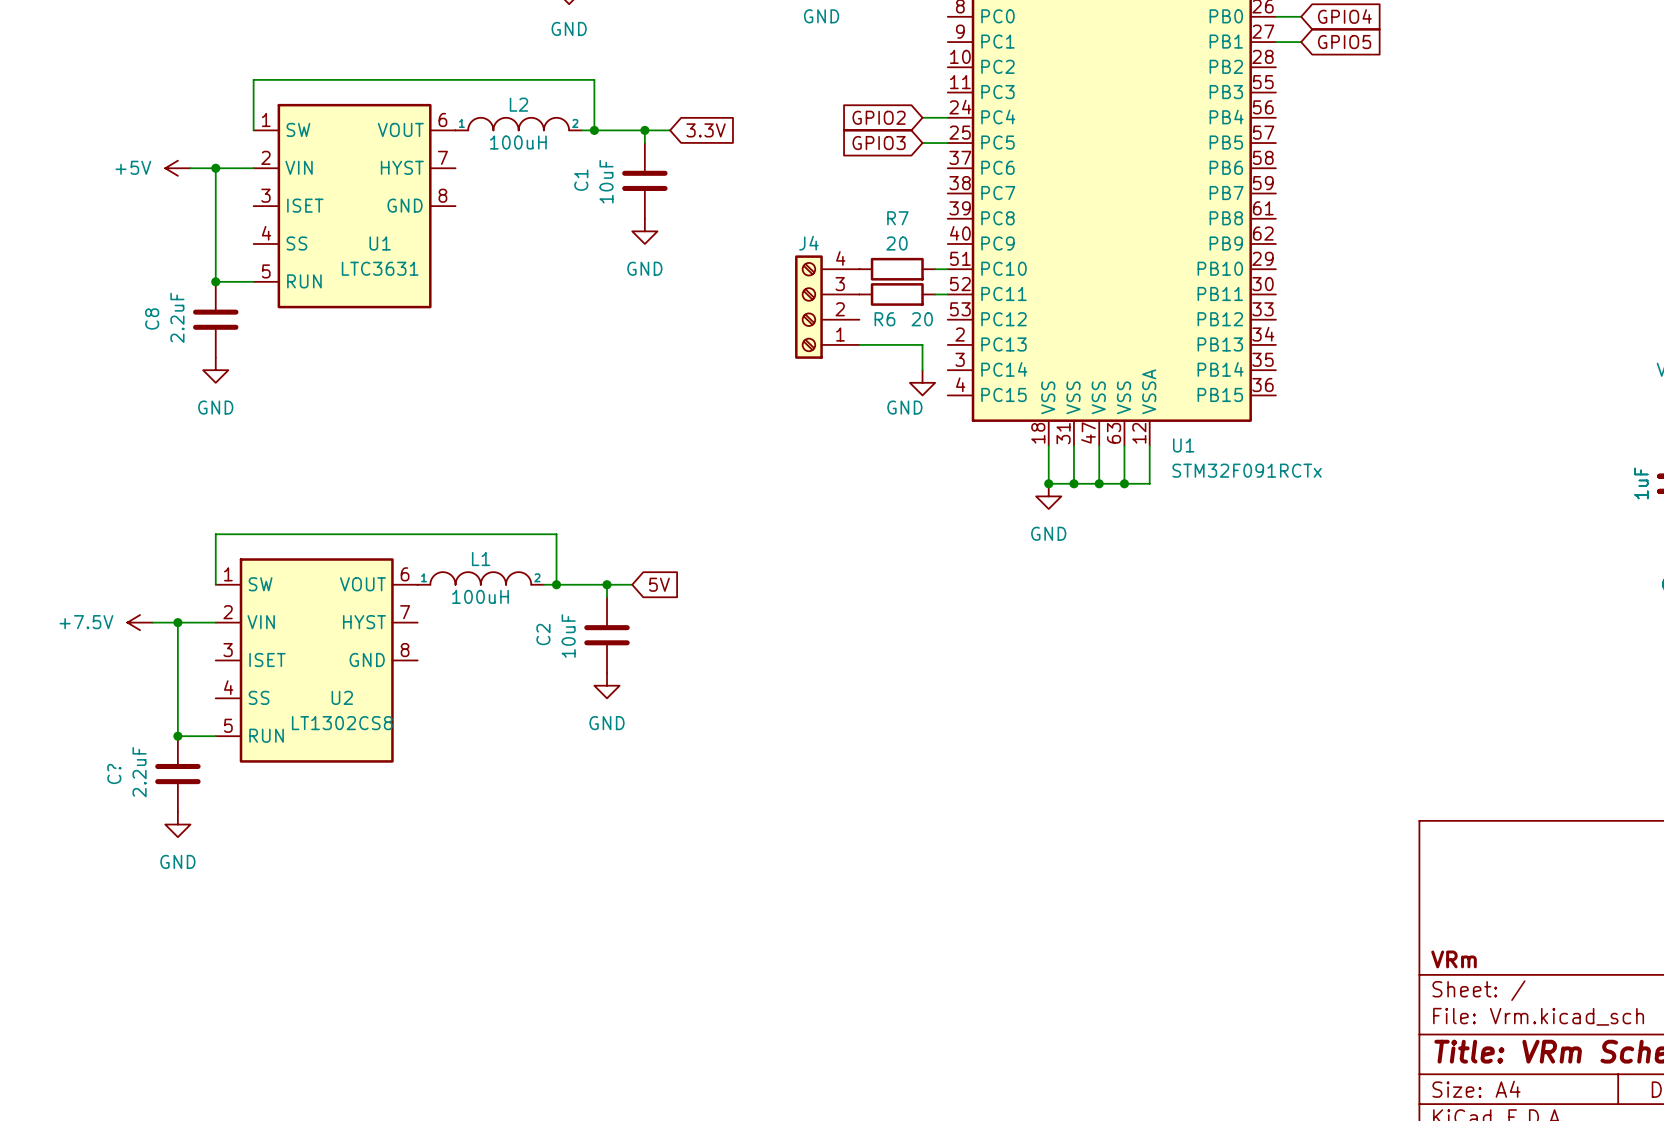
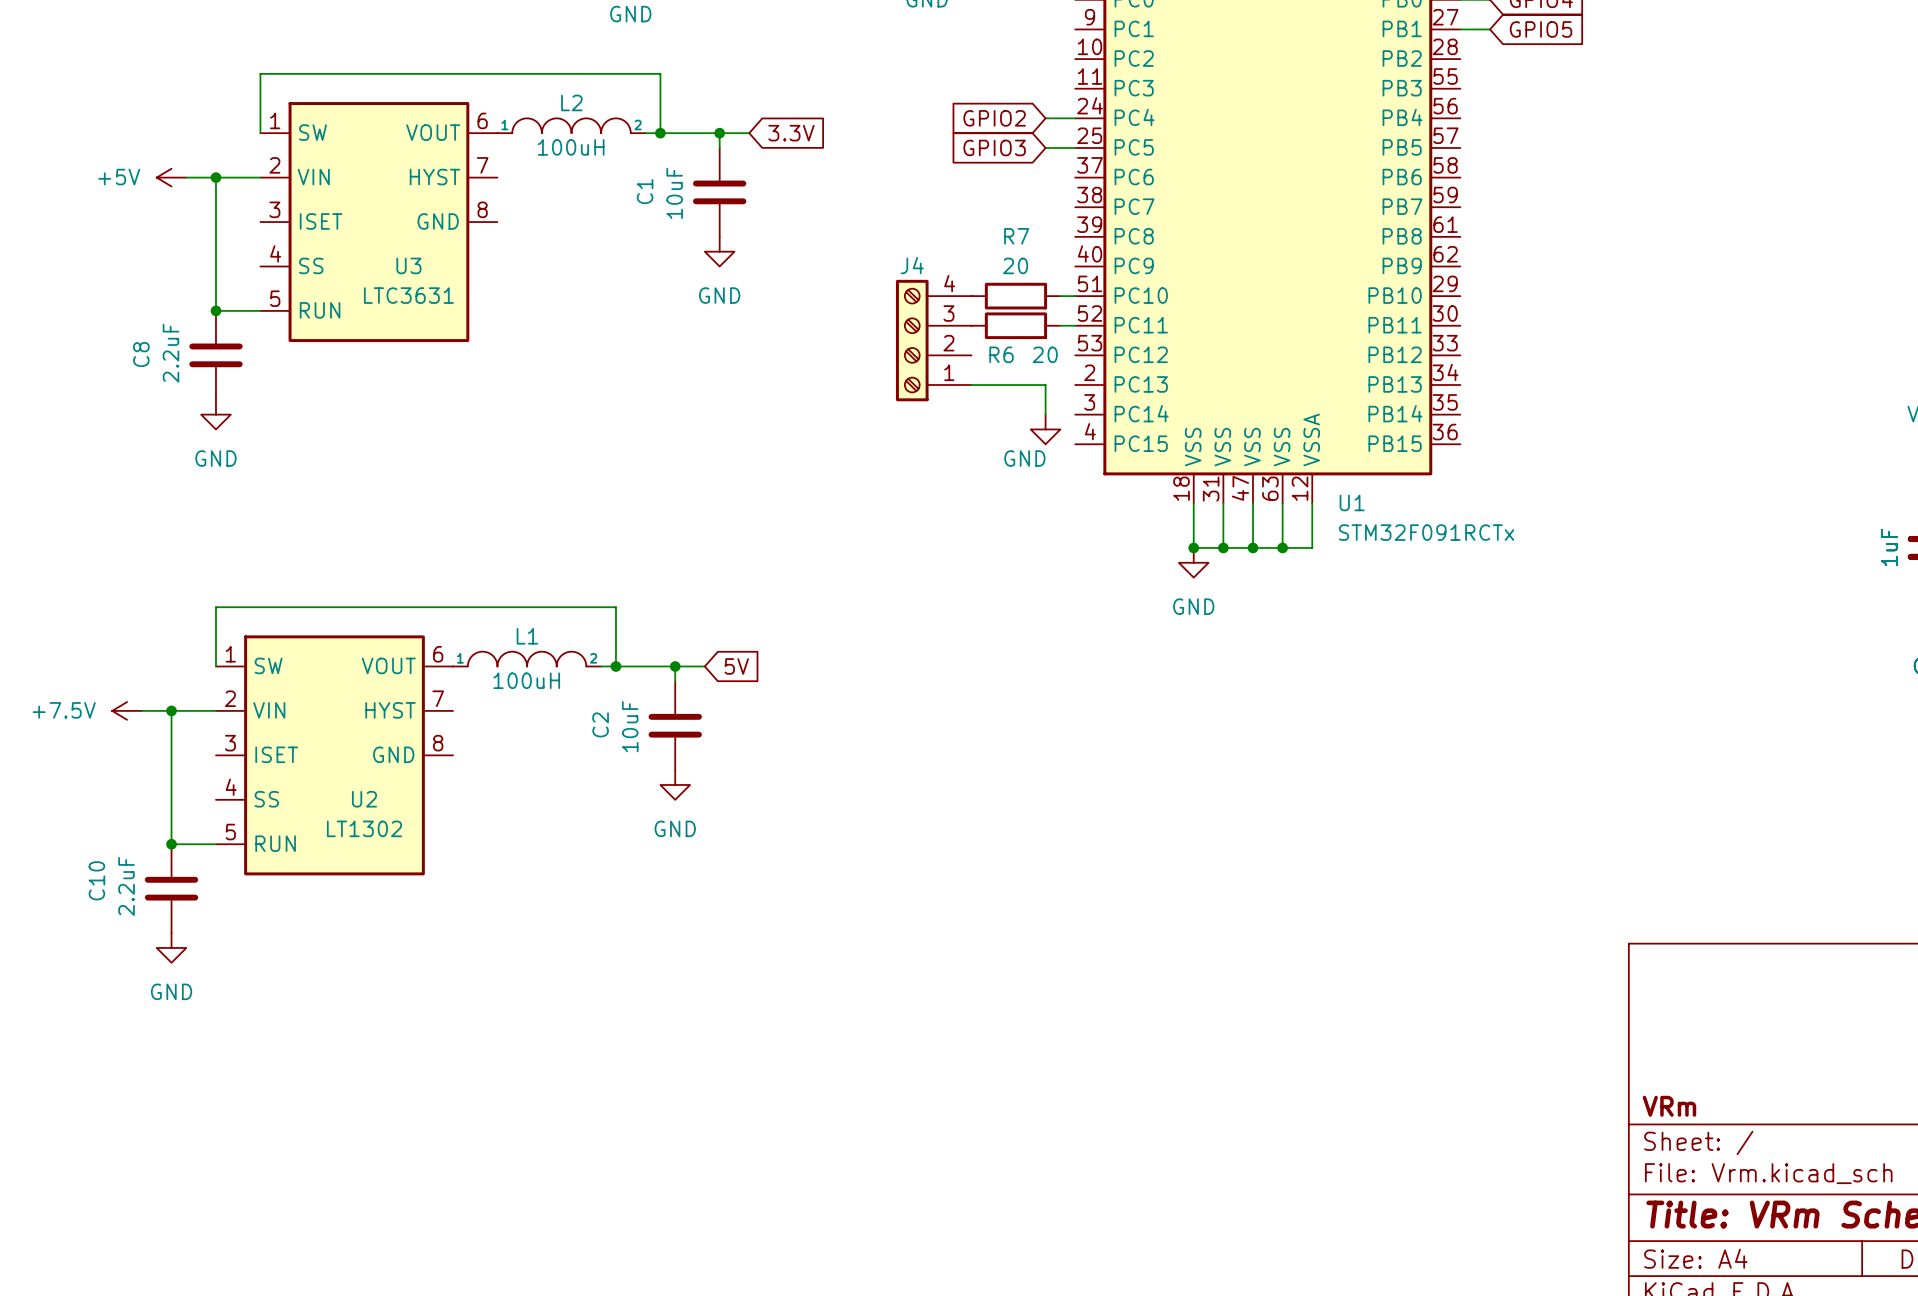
U1 name: U1 (380, 243) -> U3 (408, 265)
U2 value: LT1302CS8 (342, 723) -> LT1302 (364, 828)
C? name: C? (114, 773) -> C10 (96, 880)

